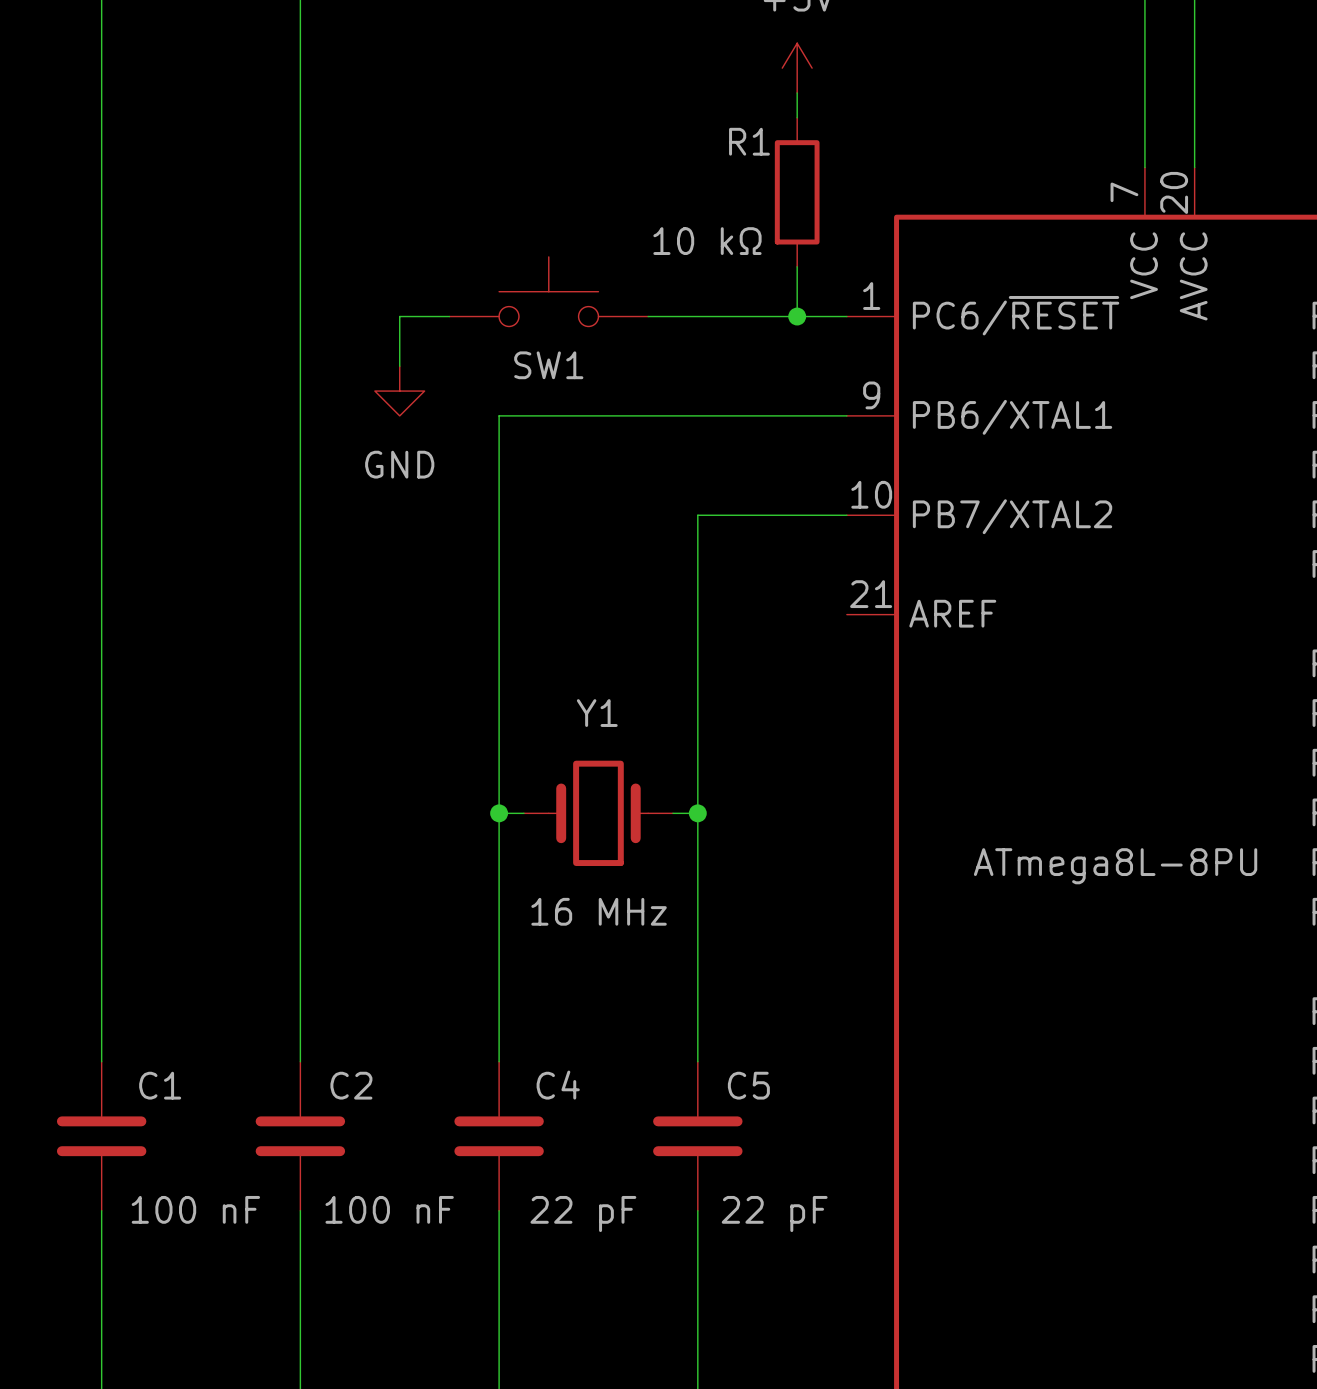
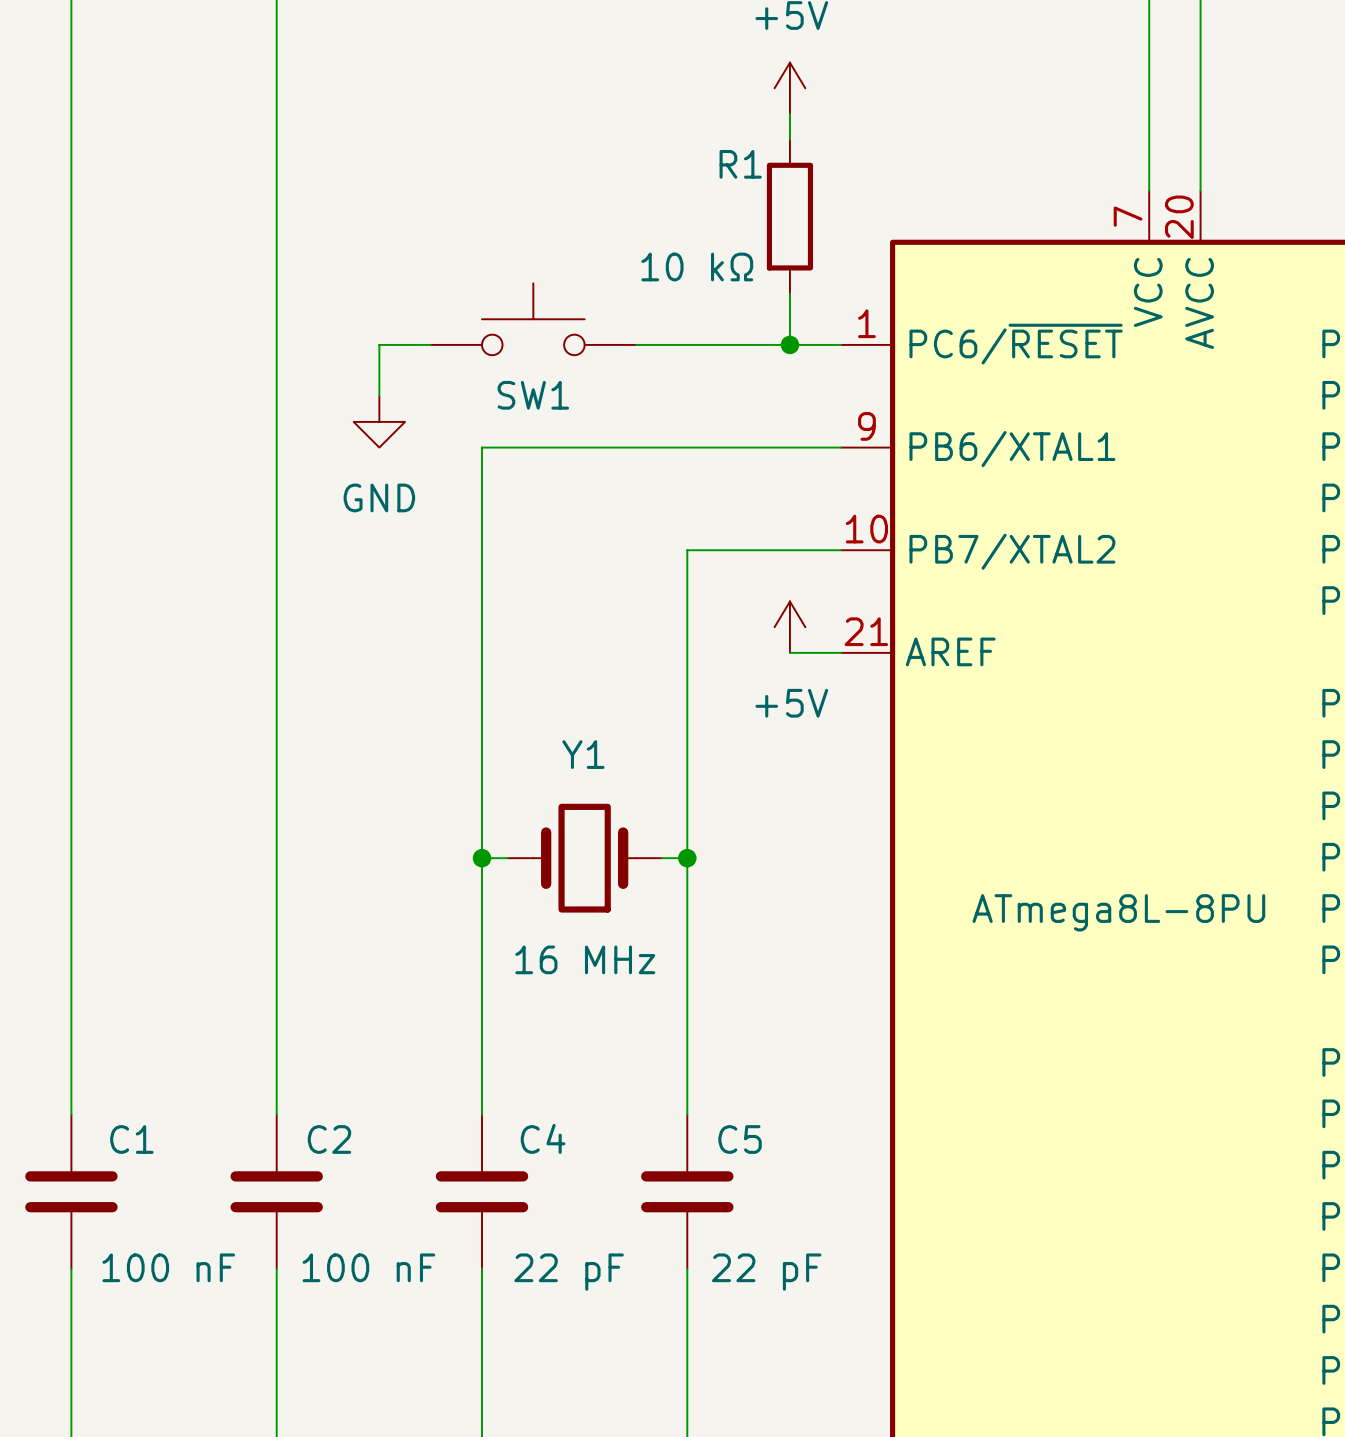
power symbol: none -> +5V (789, 627)
wire: none -> (789, 652) (841, 652)

